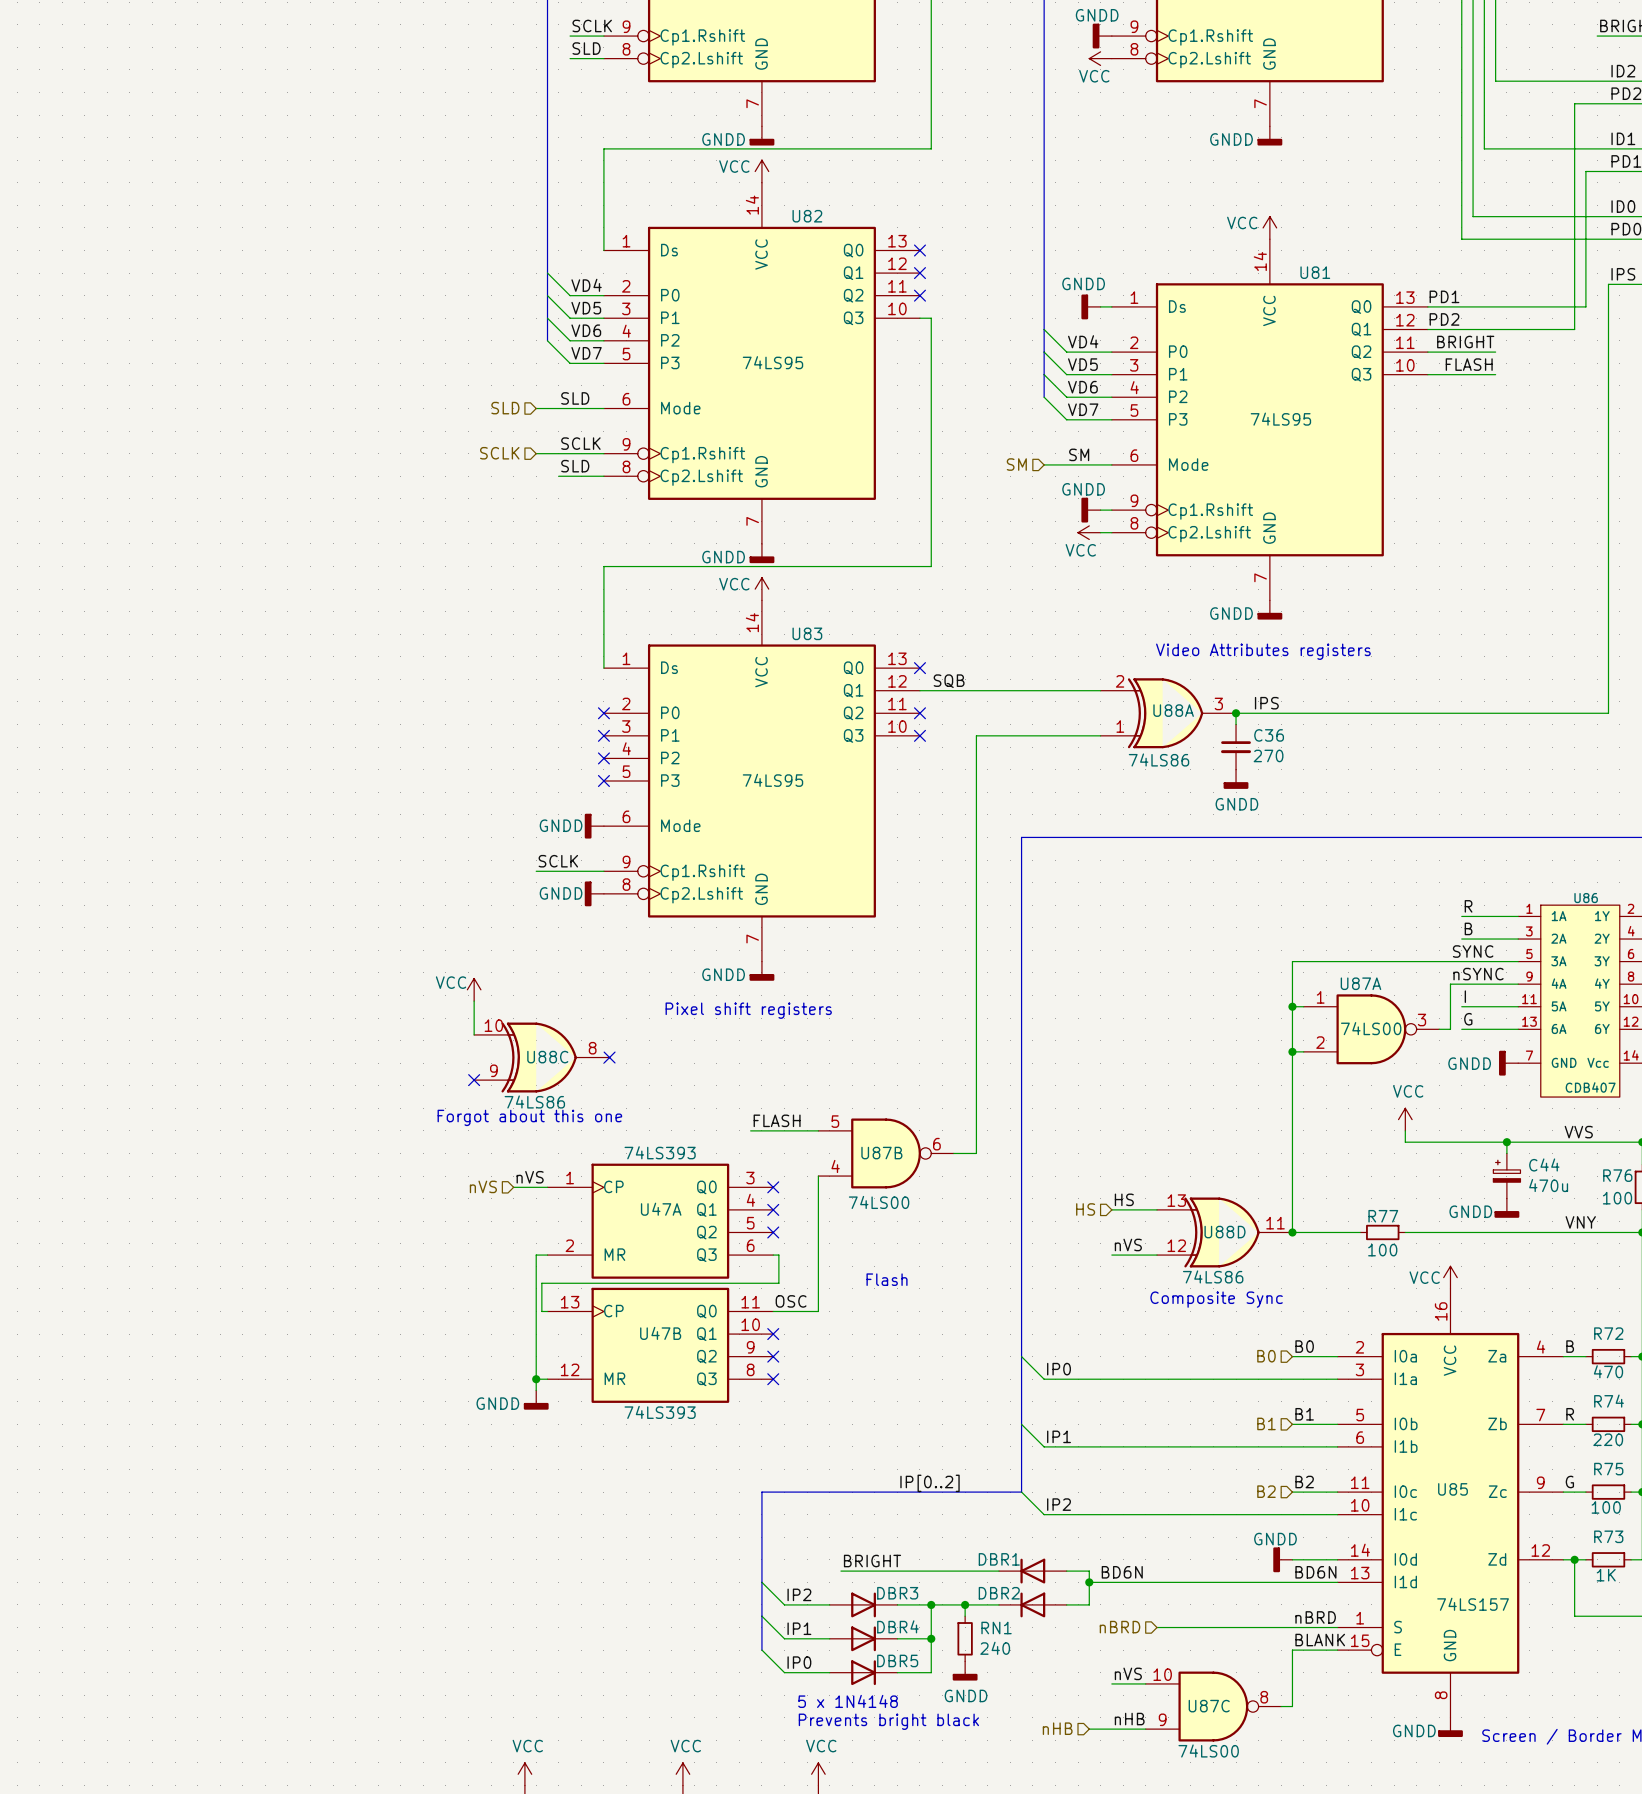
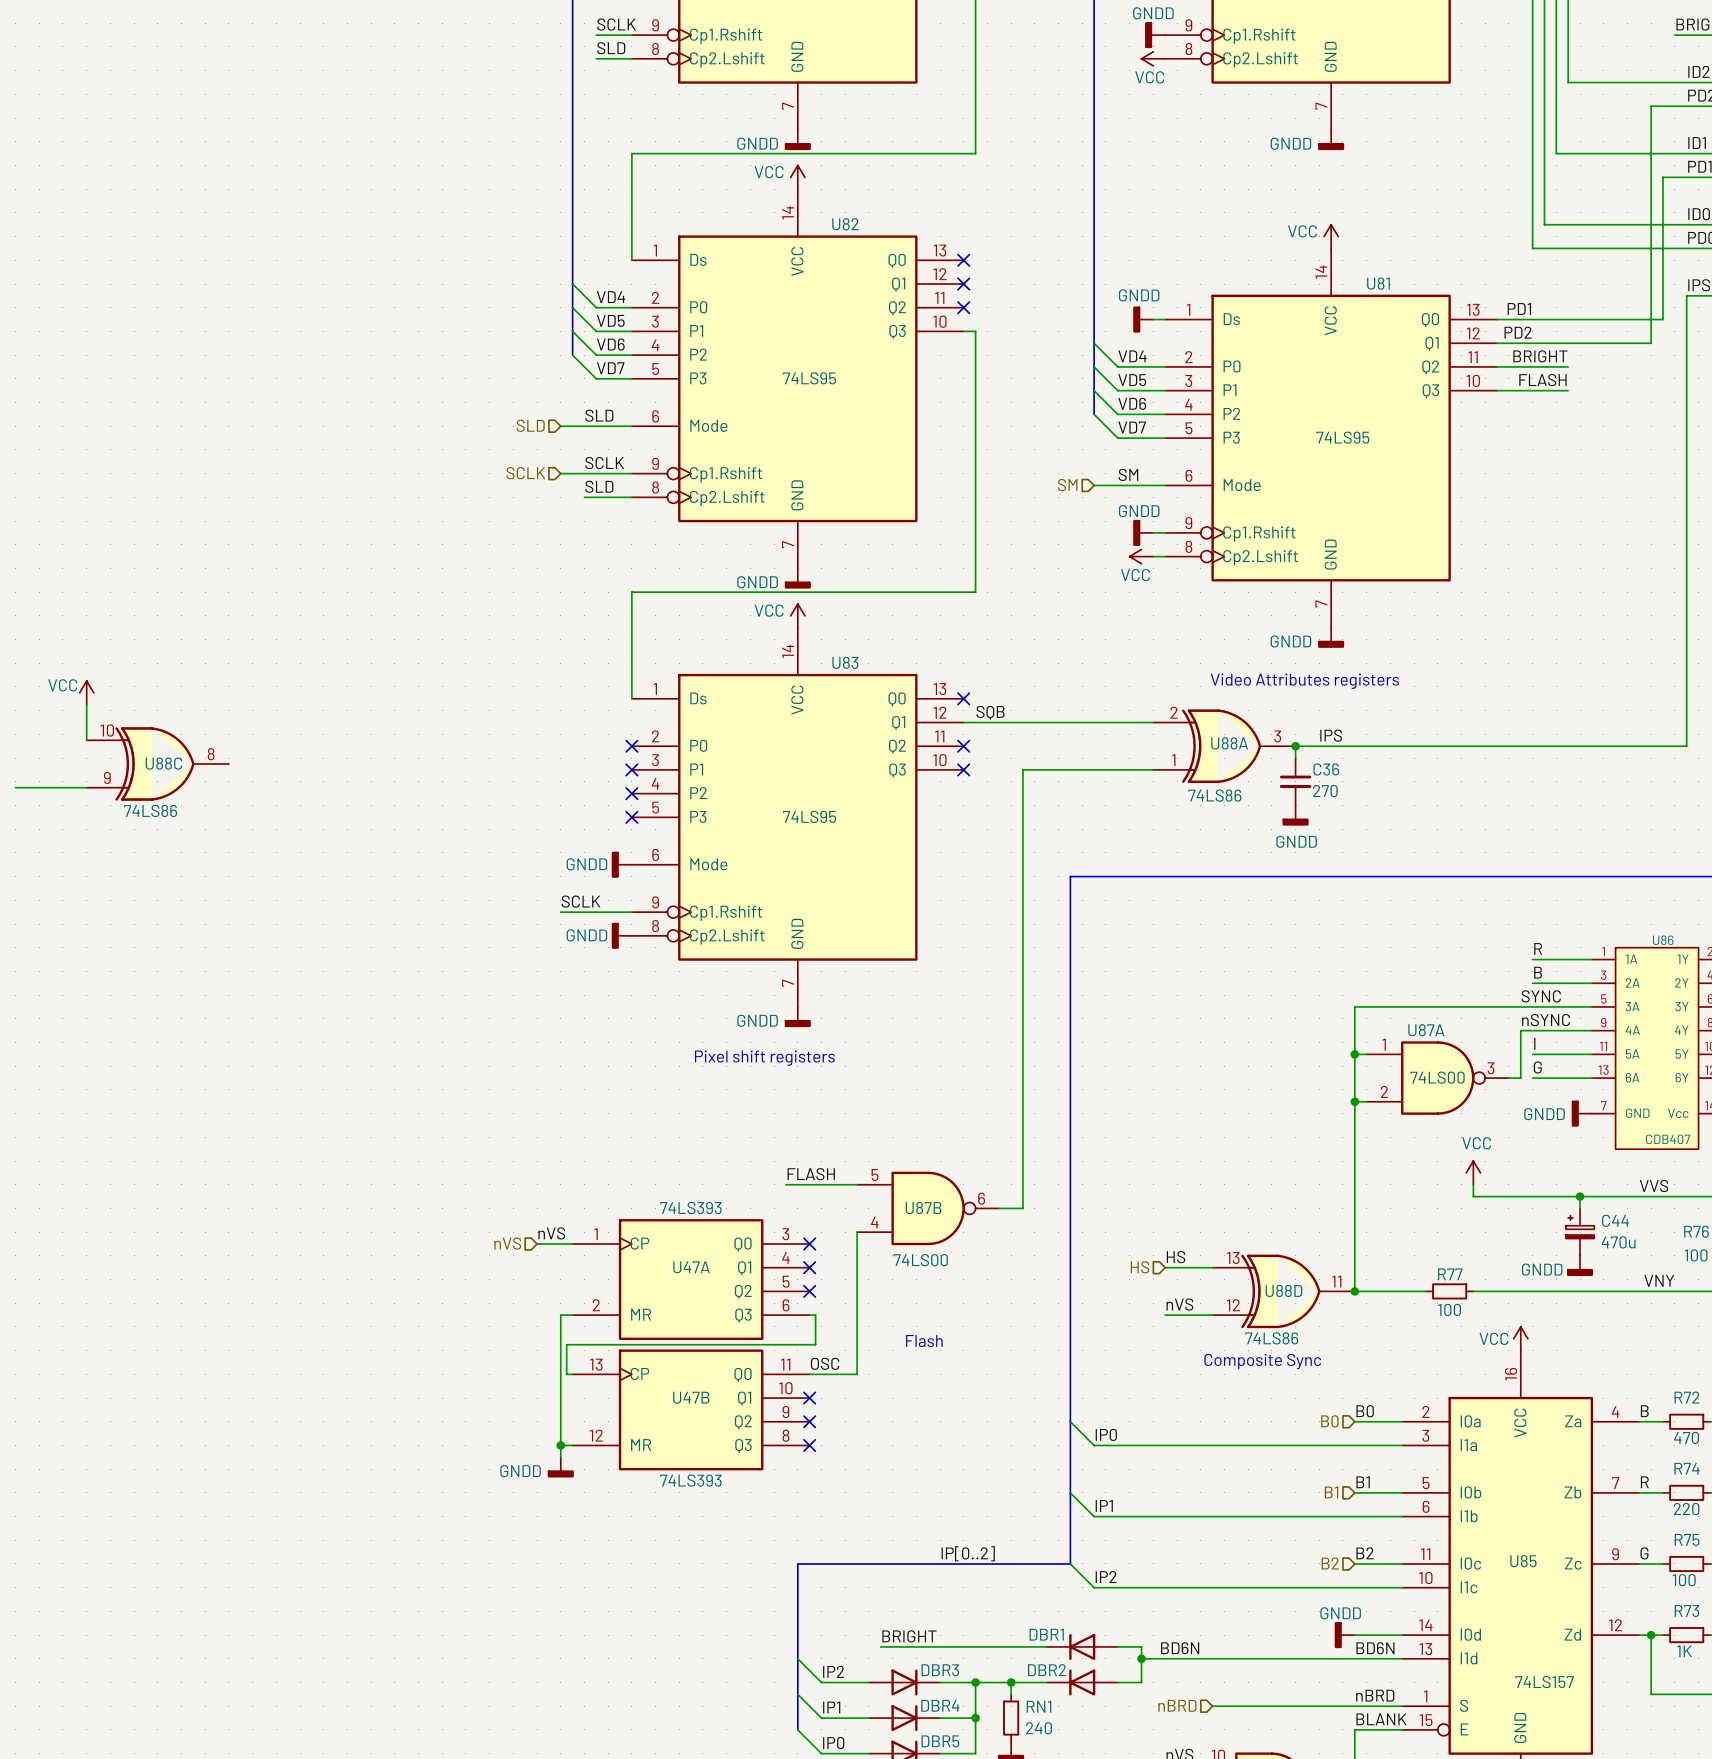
power symbol: none -> VCC (86, 692)
wire: none -> (86, 704) (86, 740)
wire: none -> (15, 787) (86, 787)
power symbol: VCC (474, 989) -> none
wire: (474, 1001) (474, 1034) -> none
U88C position: (541, 1057) -> (157, 764)
no-connect mark: (609, 1057) -> none
no-connect mark: (474, 1080) -> none
text: Forgot about this one (529, 1117) -> none

